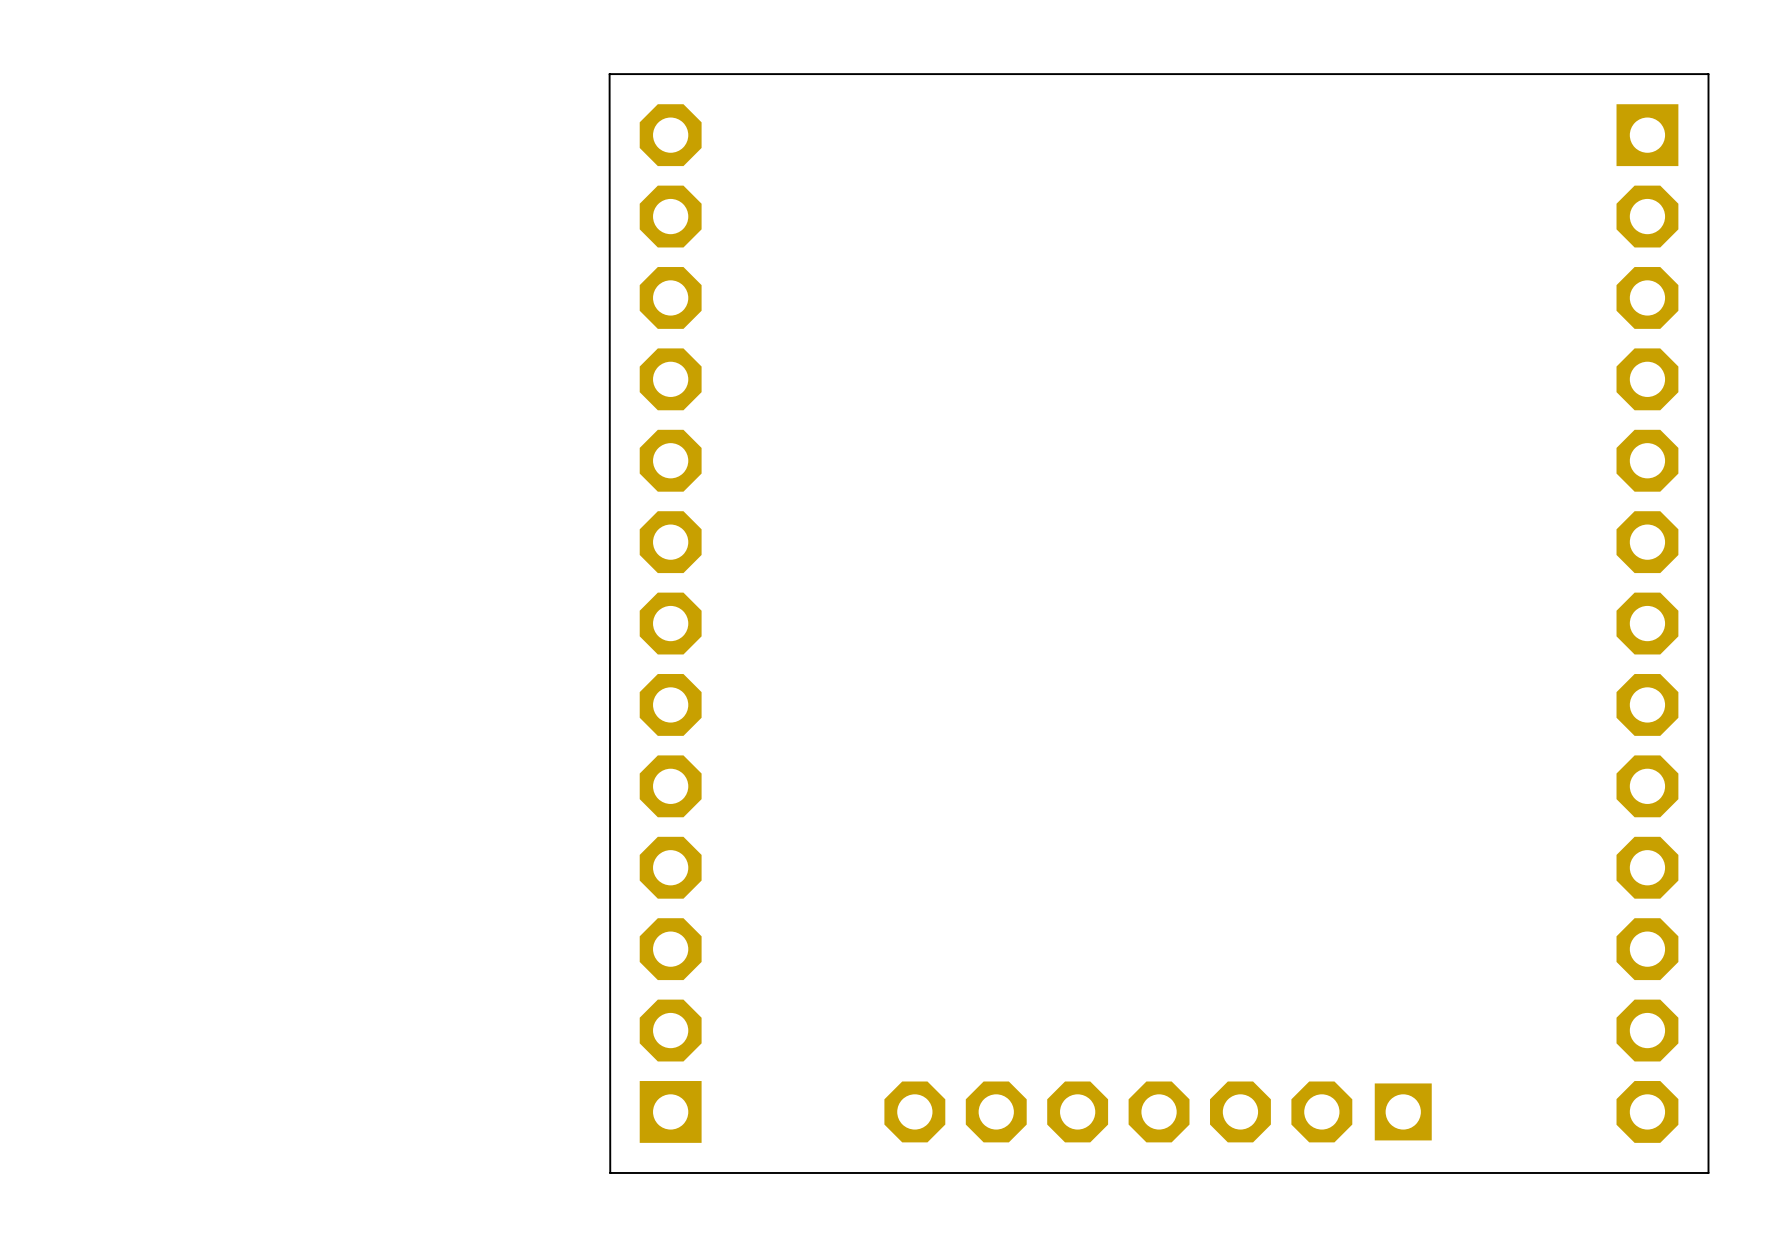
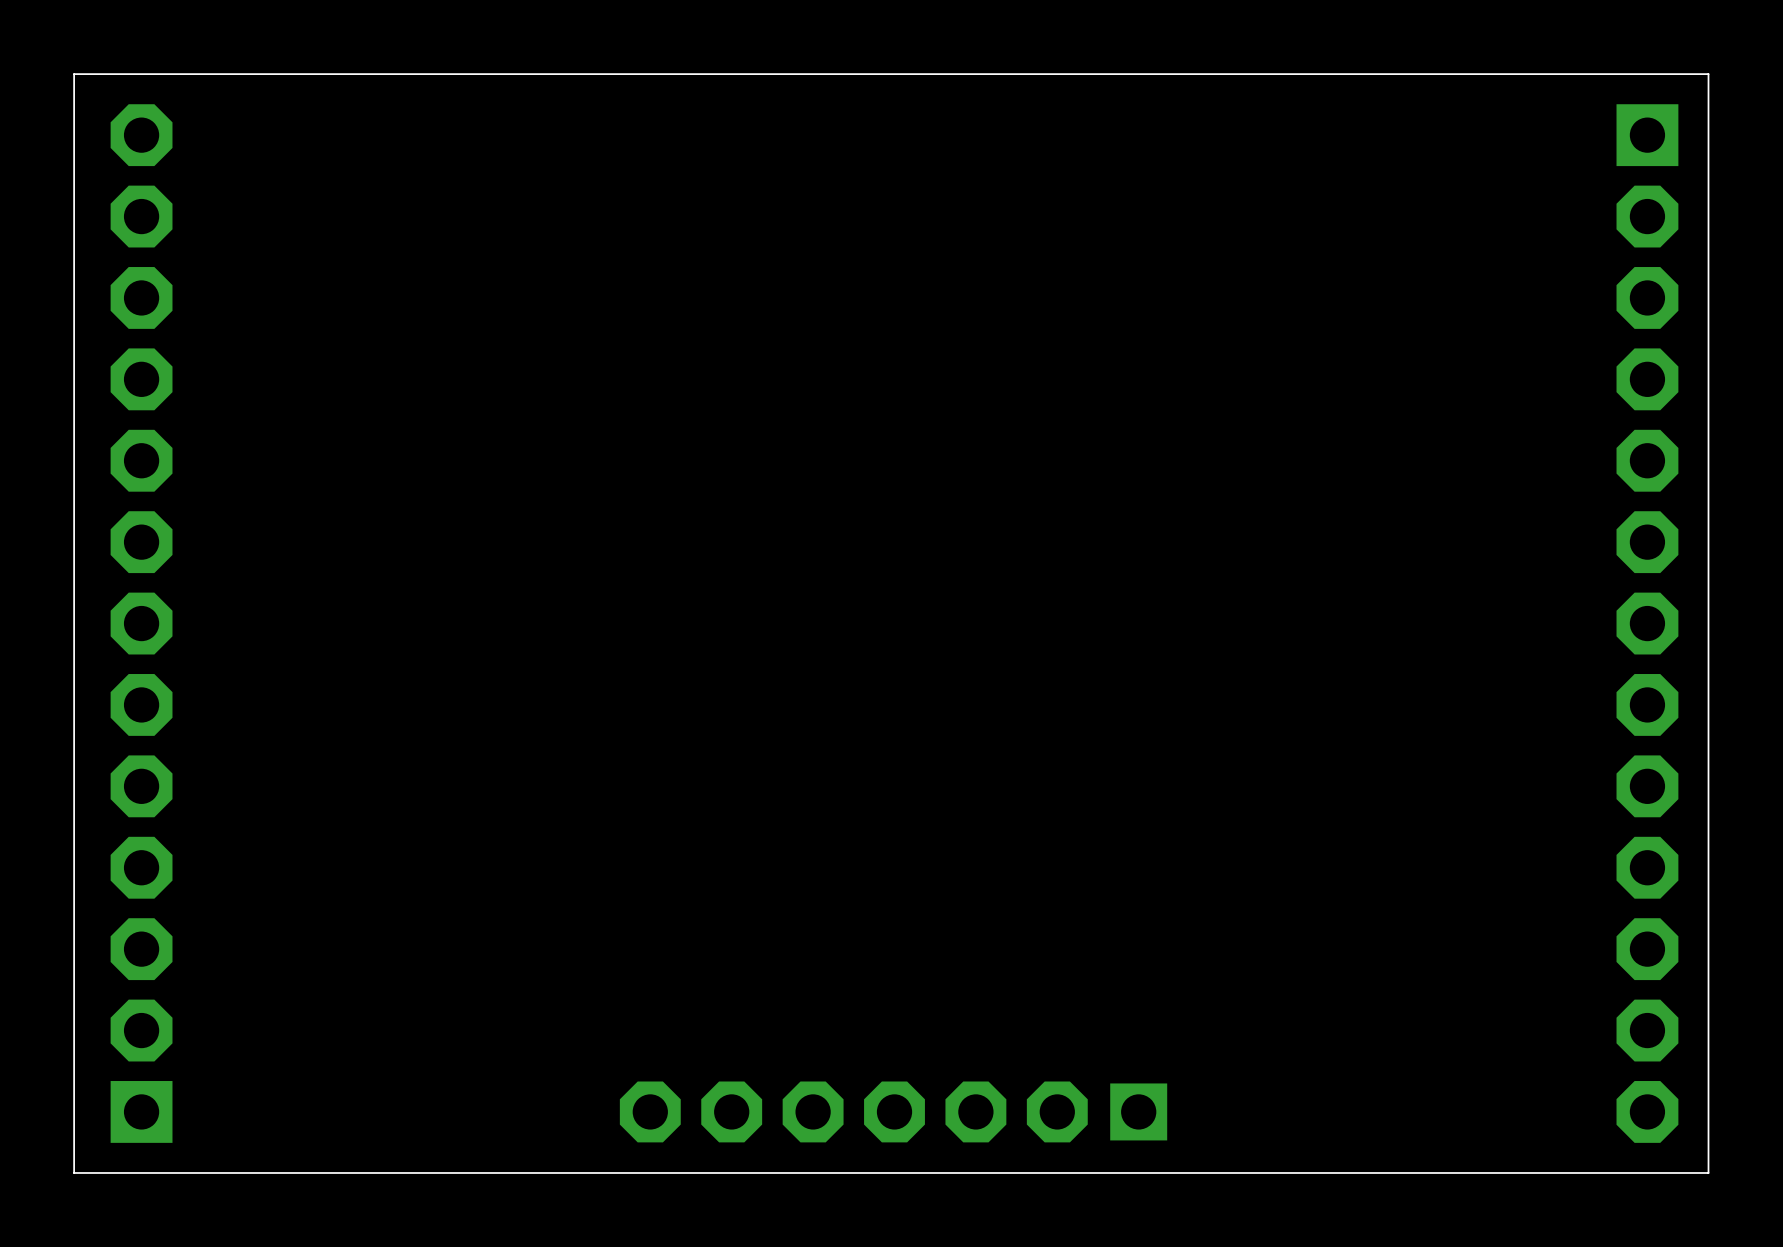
board edge: (609, 74) (610, 1172) -> (609, 74) (74, 74) (74, 1172) (610, 1172)
part position: (670, 623) -> (141, 623)
part position: (1158, 1111) -> (893, 1111)

